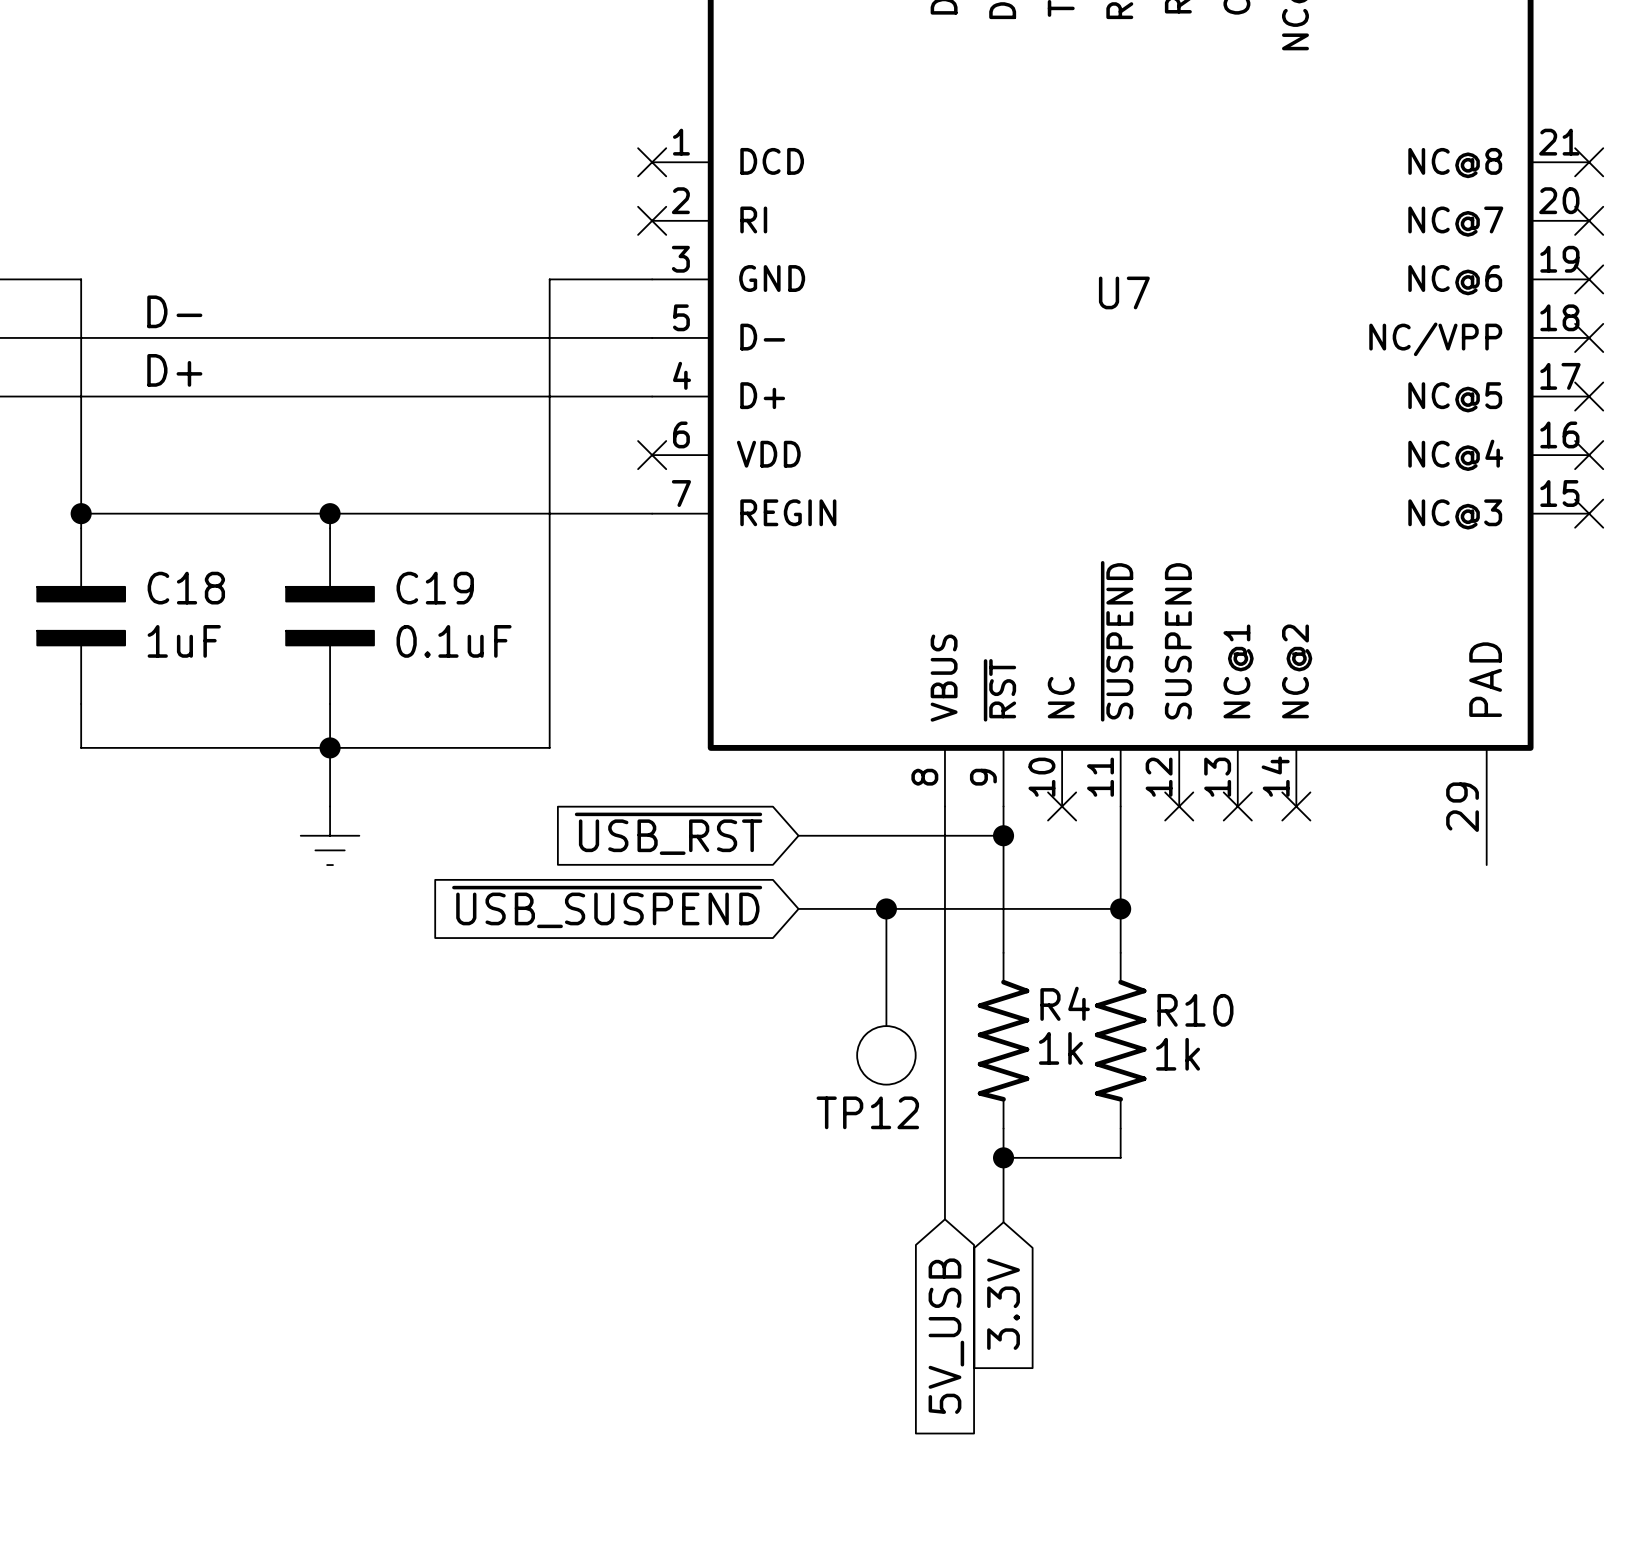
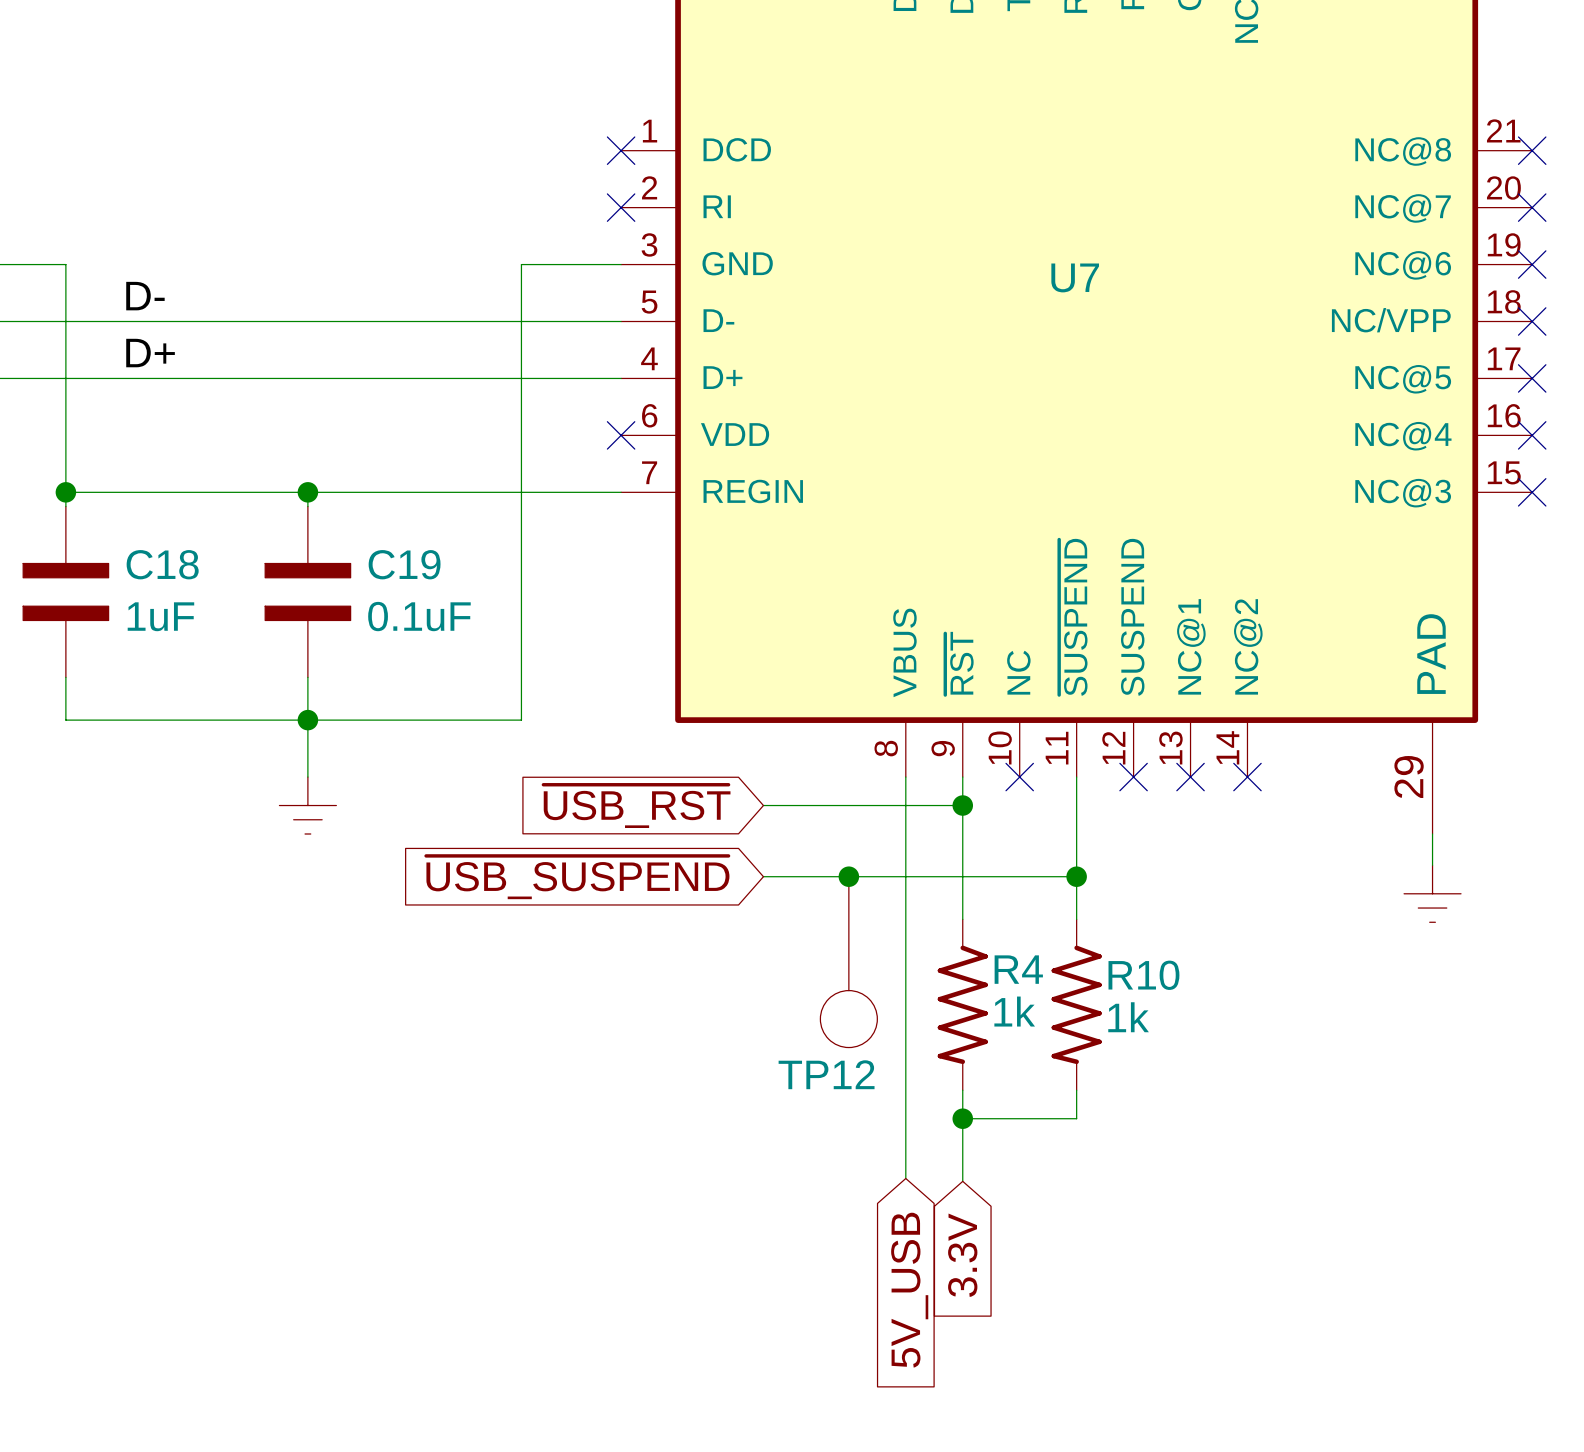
wire: none -> (1432, 834) (1432, 865)
power symbol: none -> (1432, 893)

